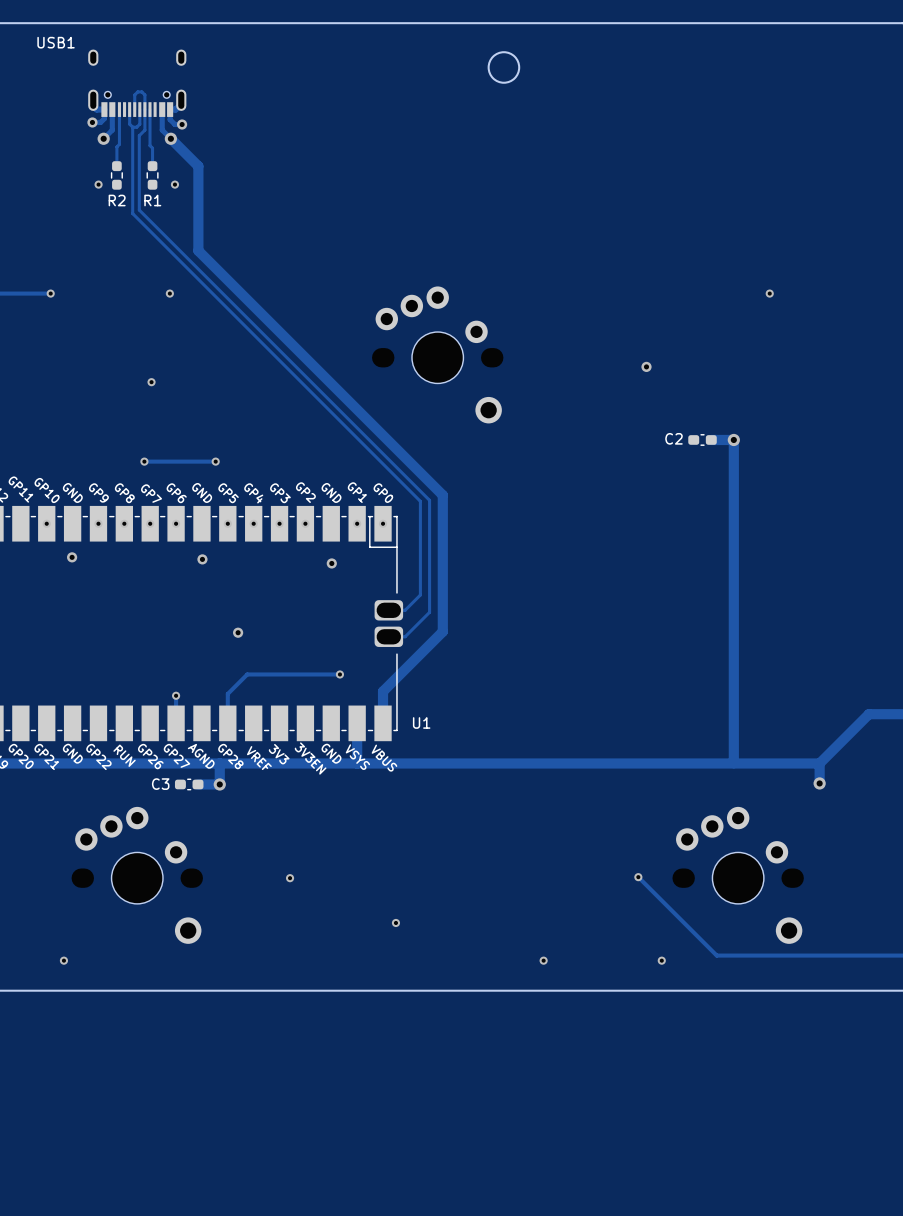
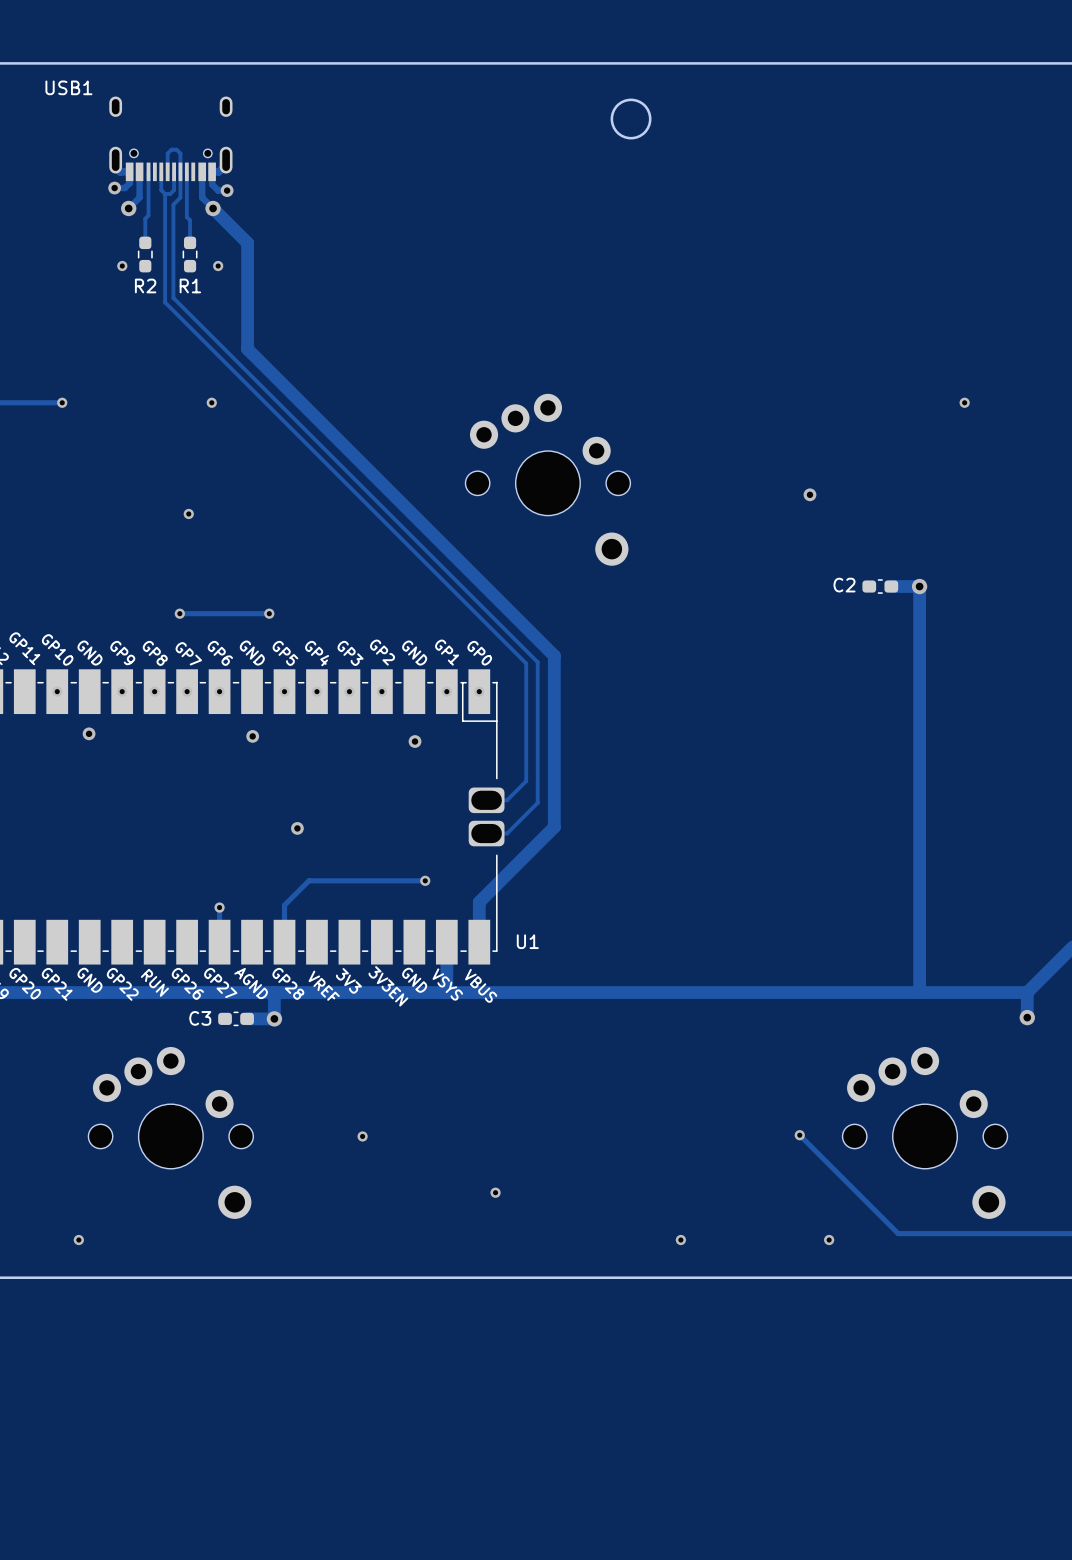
part footprint: [372, 286, 504, 424] -> [465, 393, 631, 566]
part footprint: [71, 806, 203, 944] -> [88, 1047, 254, 1219]
part footprint: [672, 806, 804, 944] -> [842, 1047, 1008, 1219]

